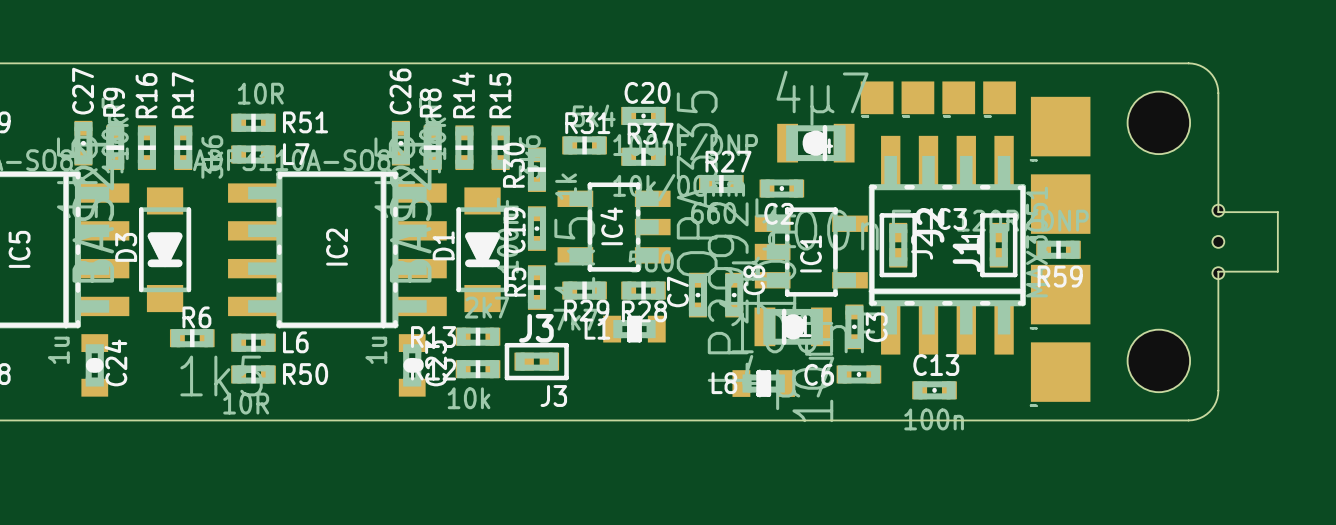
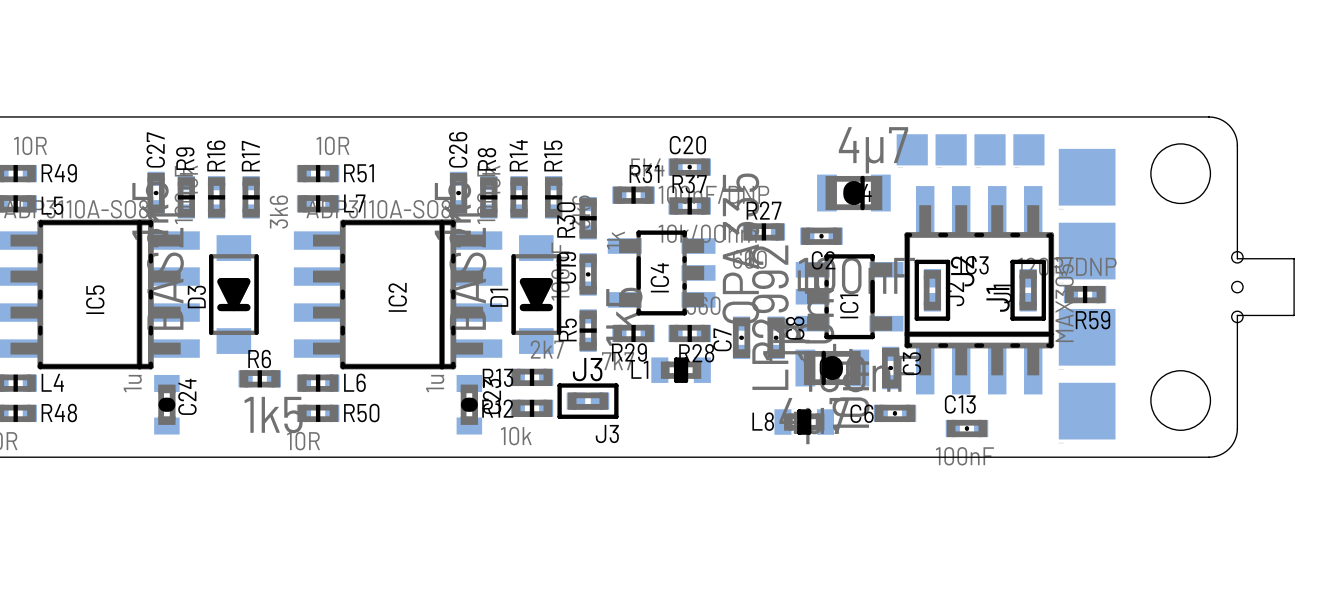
C13 value: 100n (934, 419) -> 100nF (964, 456)

